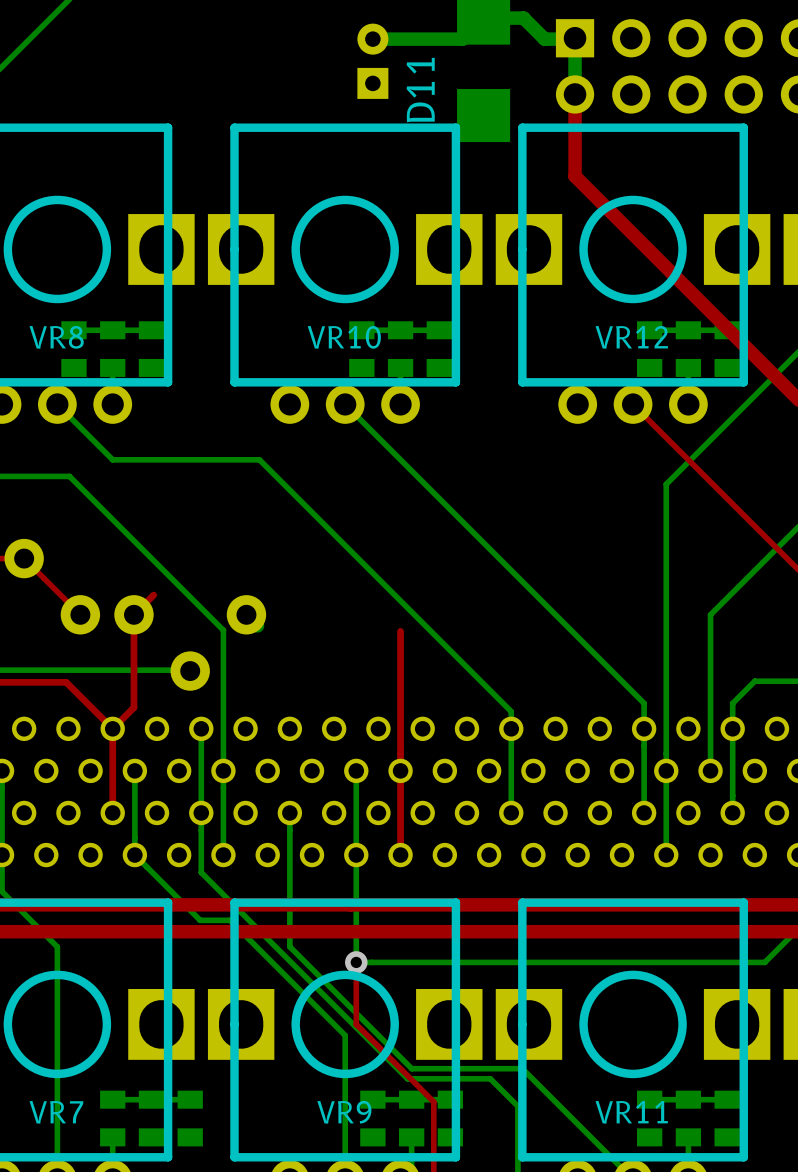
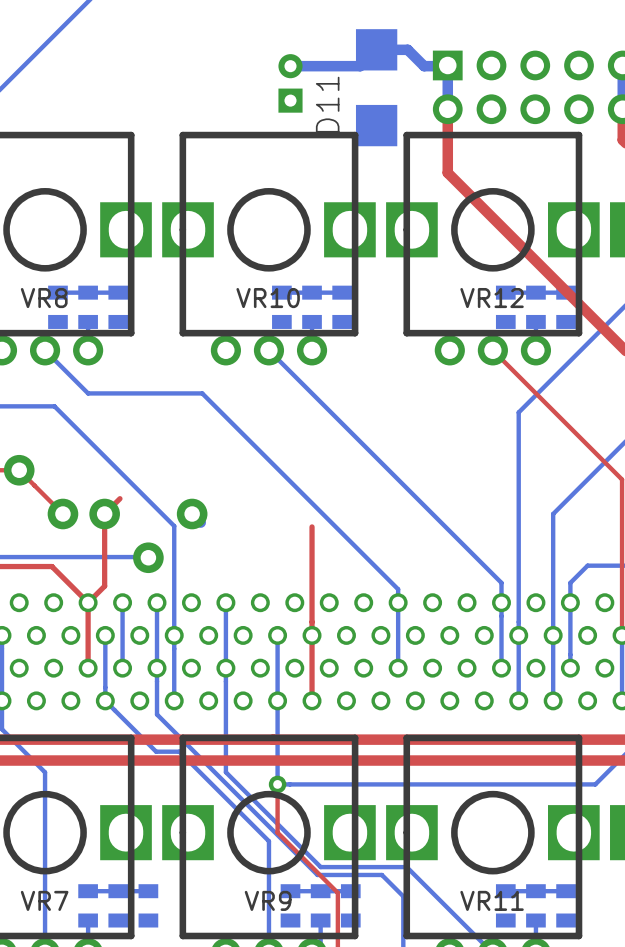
bottom track: none -> (122, 602) (122, 668)
bottom track: none -> (225, 602) (225, 668)
bottom track: none -> (553, 635) (553, 700)

